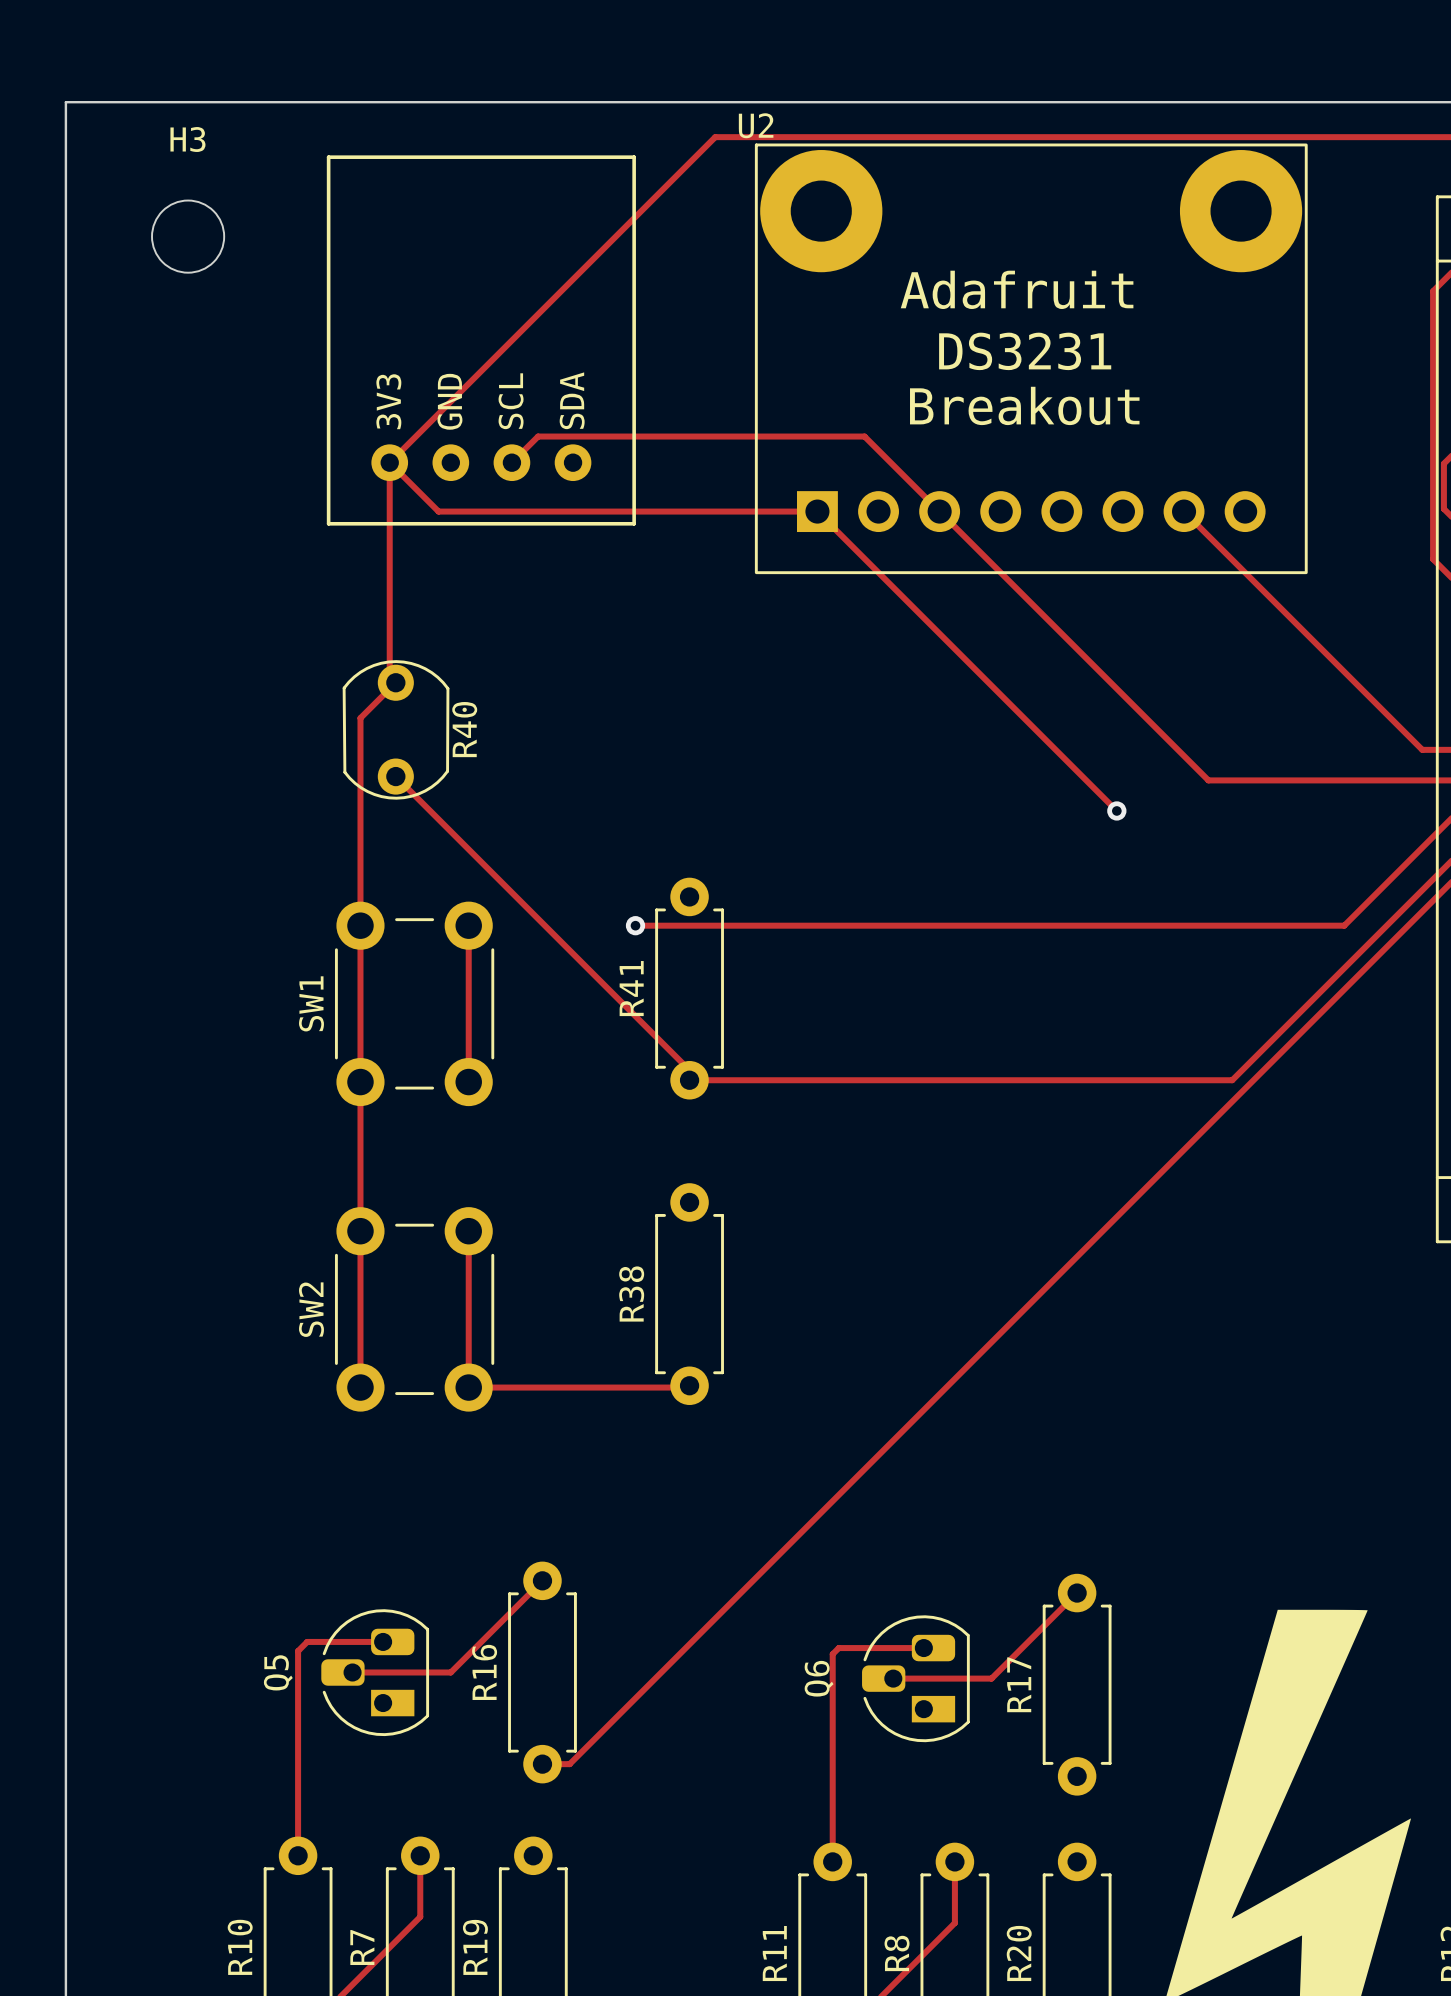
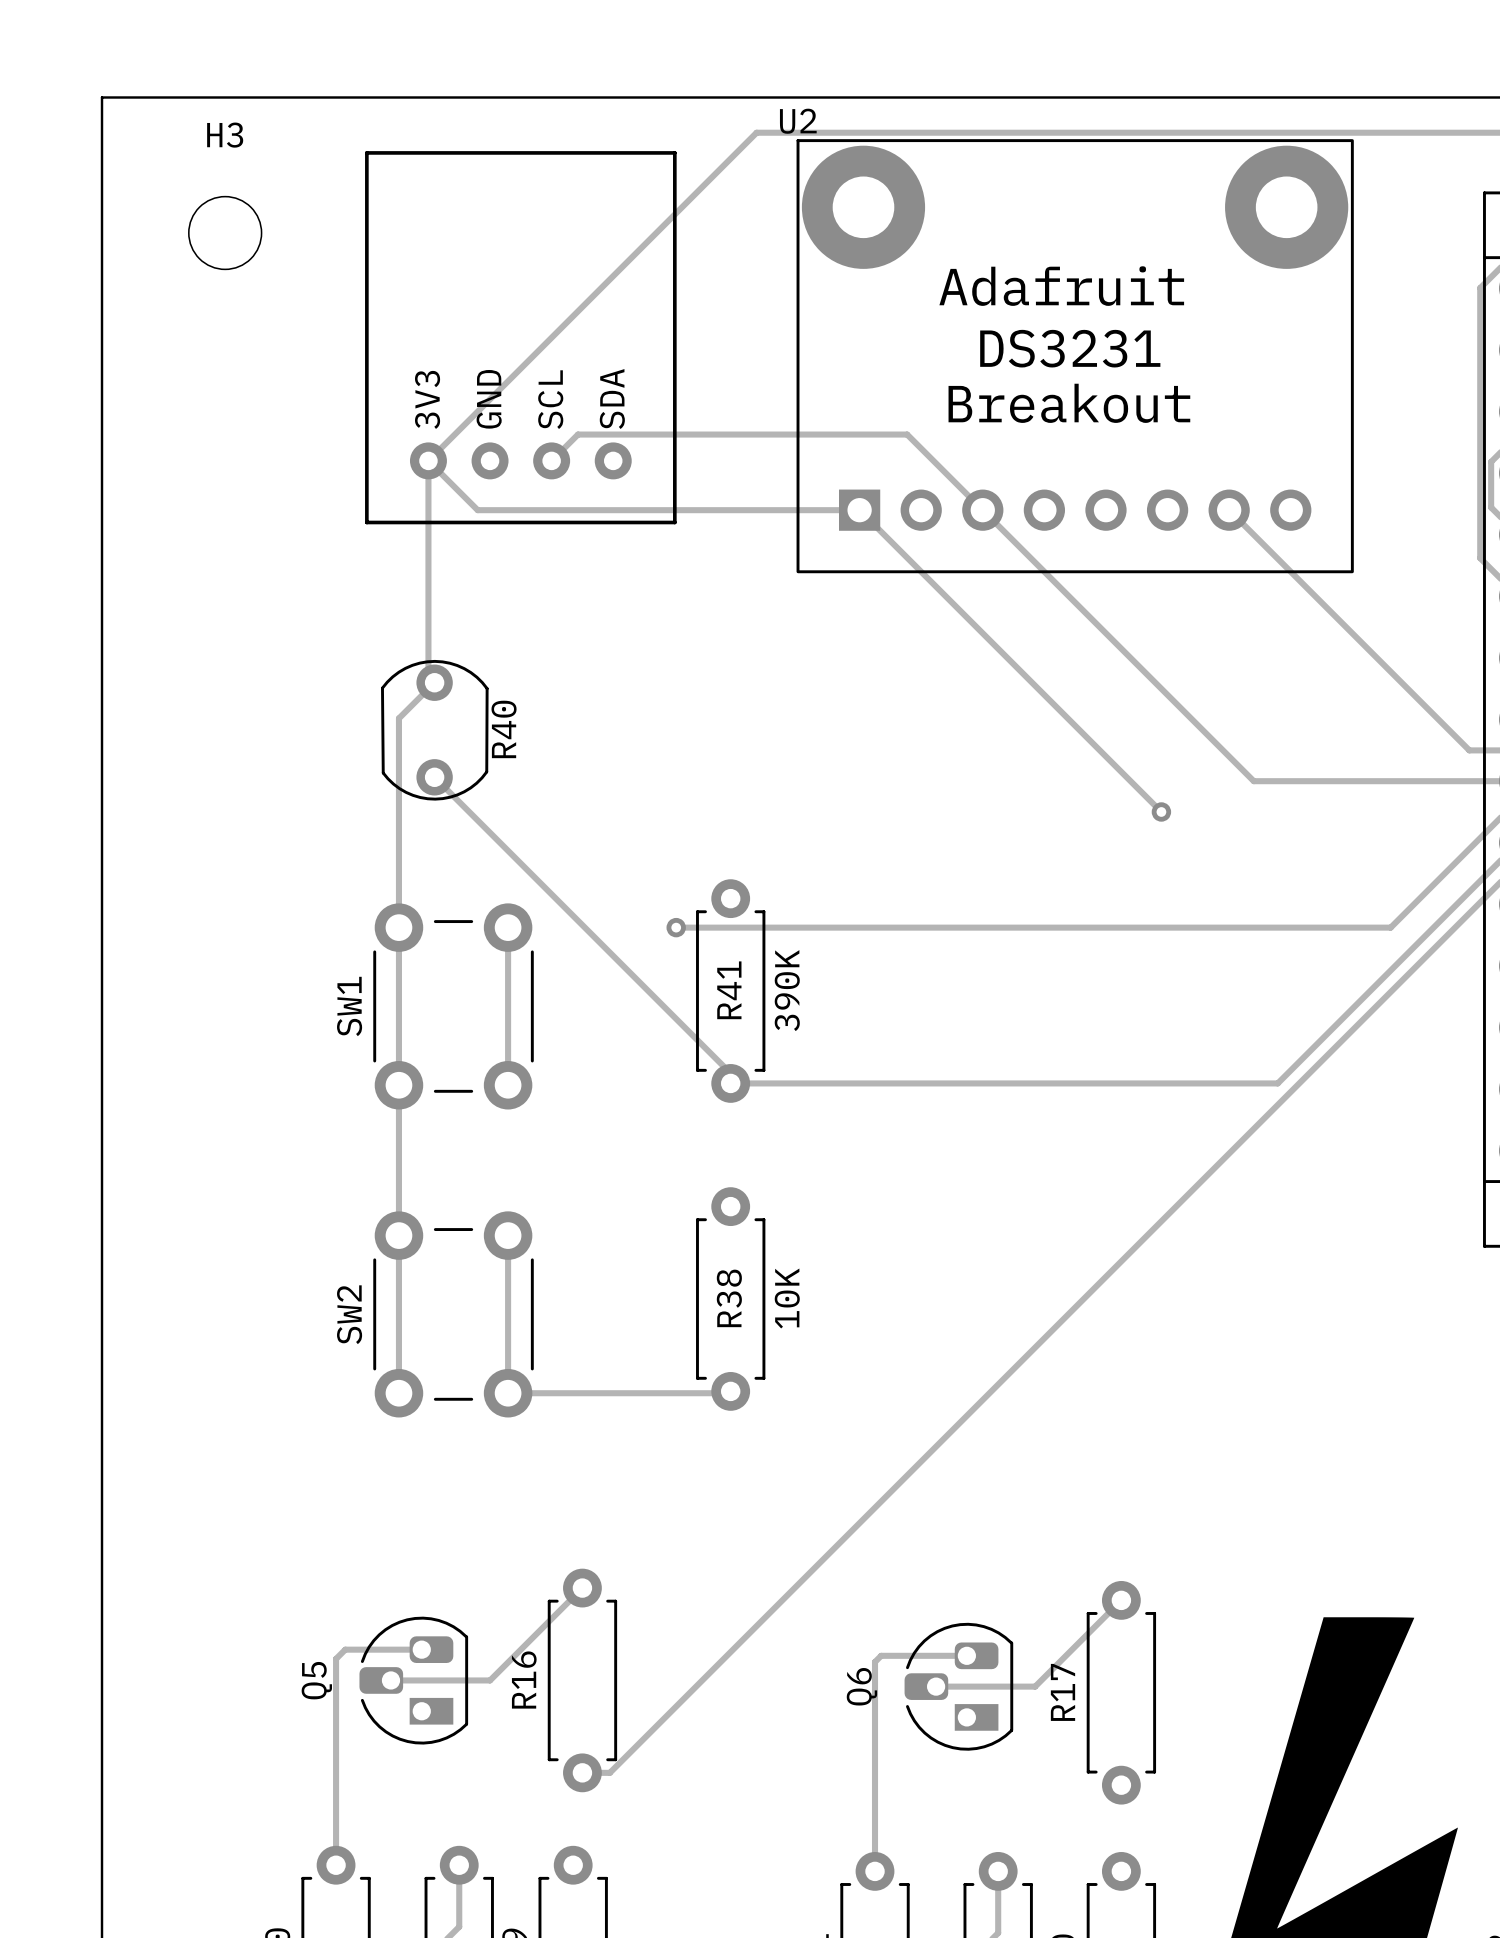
R41 value: none -> 390K (787, 990)
R41 name position: R41 (631, 988) -> R41 (729, 990)
R38 value: none -> 10K (787, 1298)
R38 name position: R38 (631, 1294) -> R38 (729, 1298)

